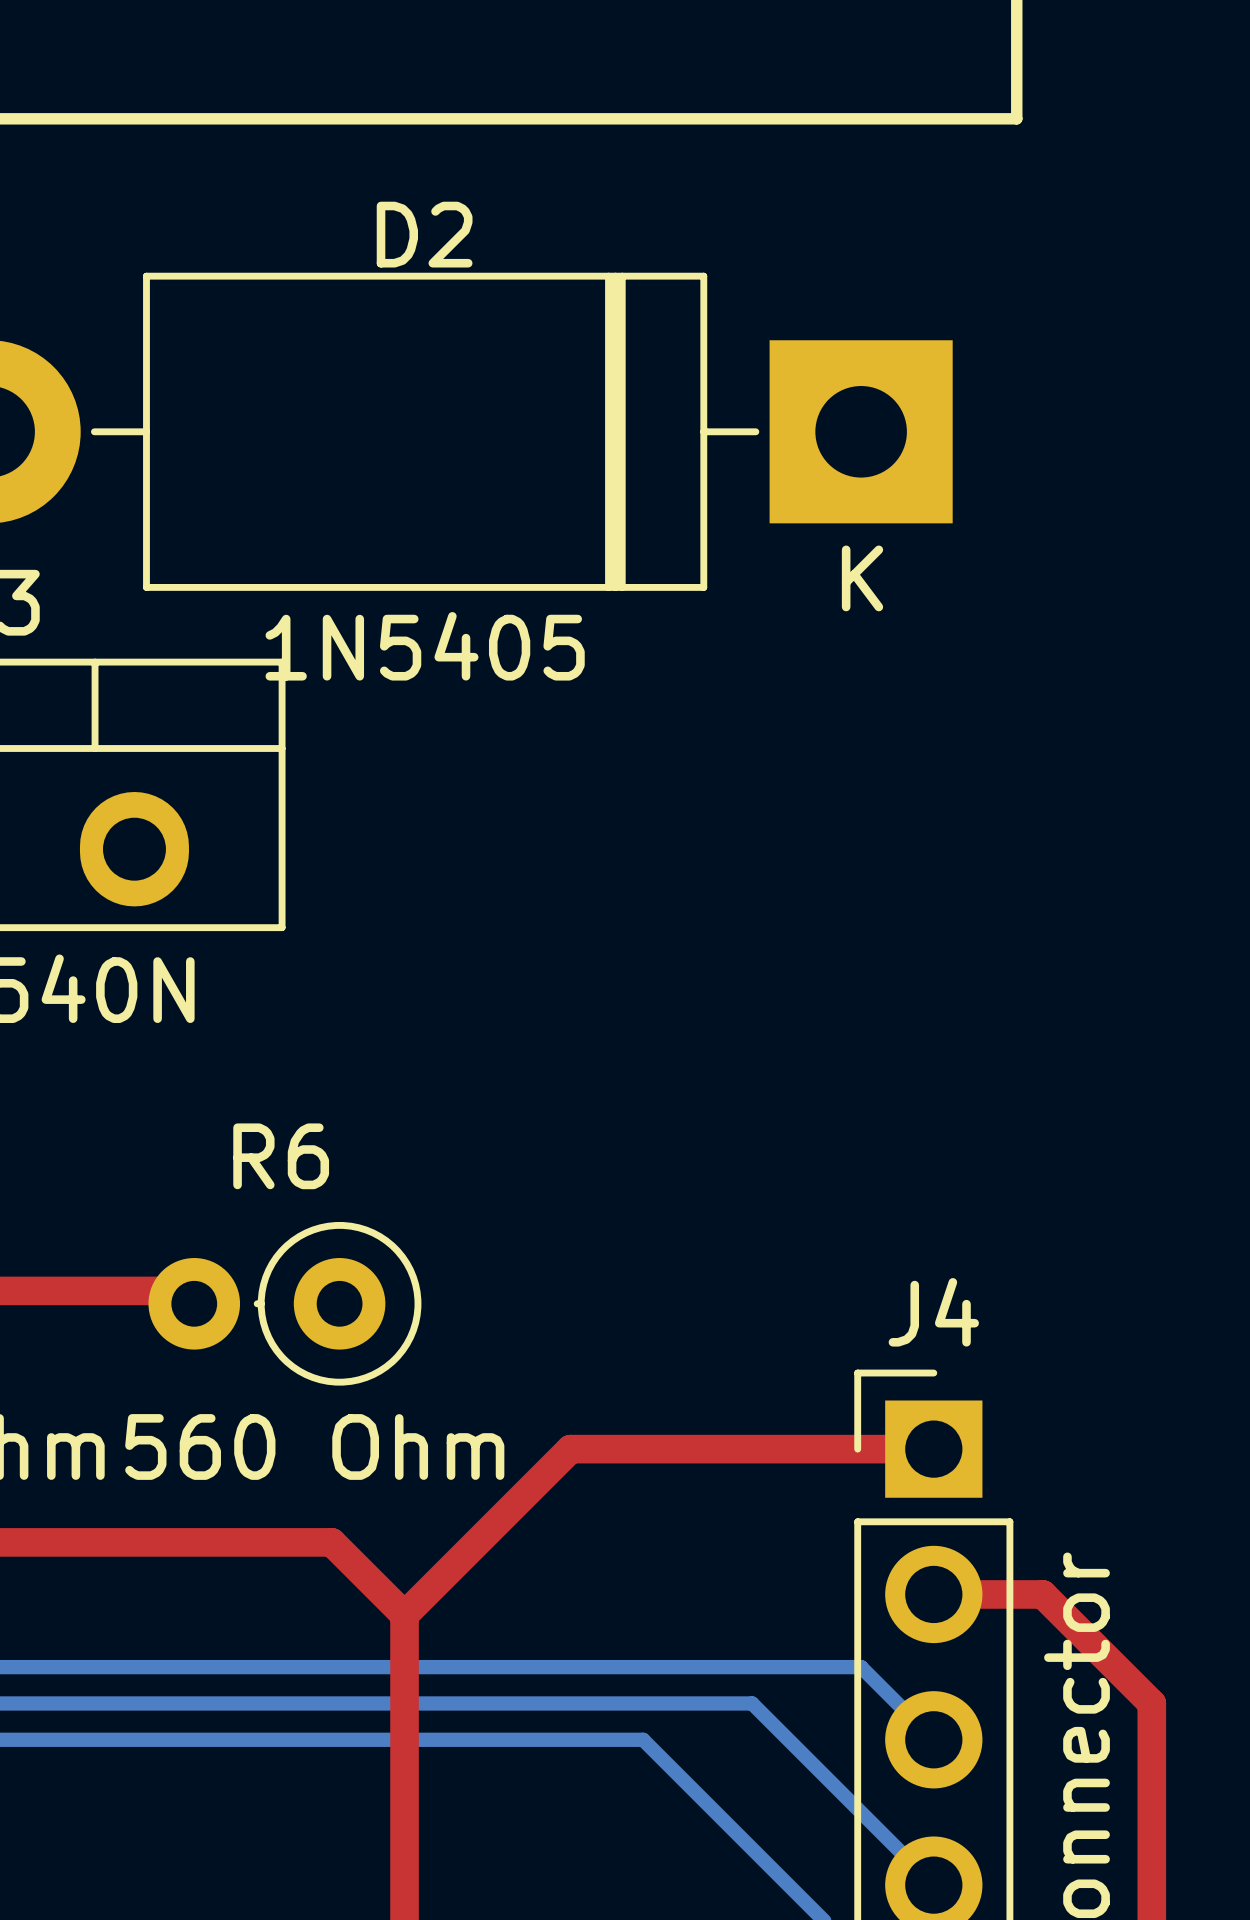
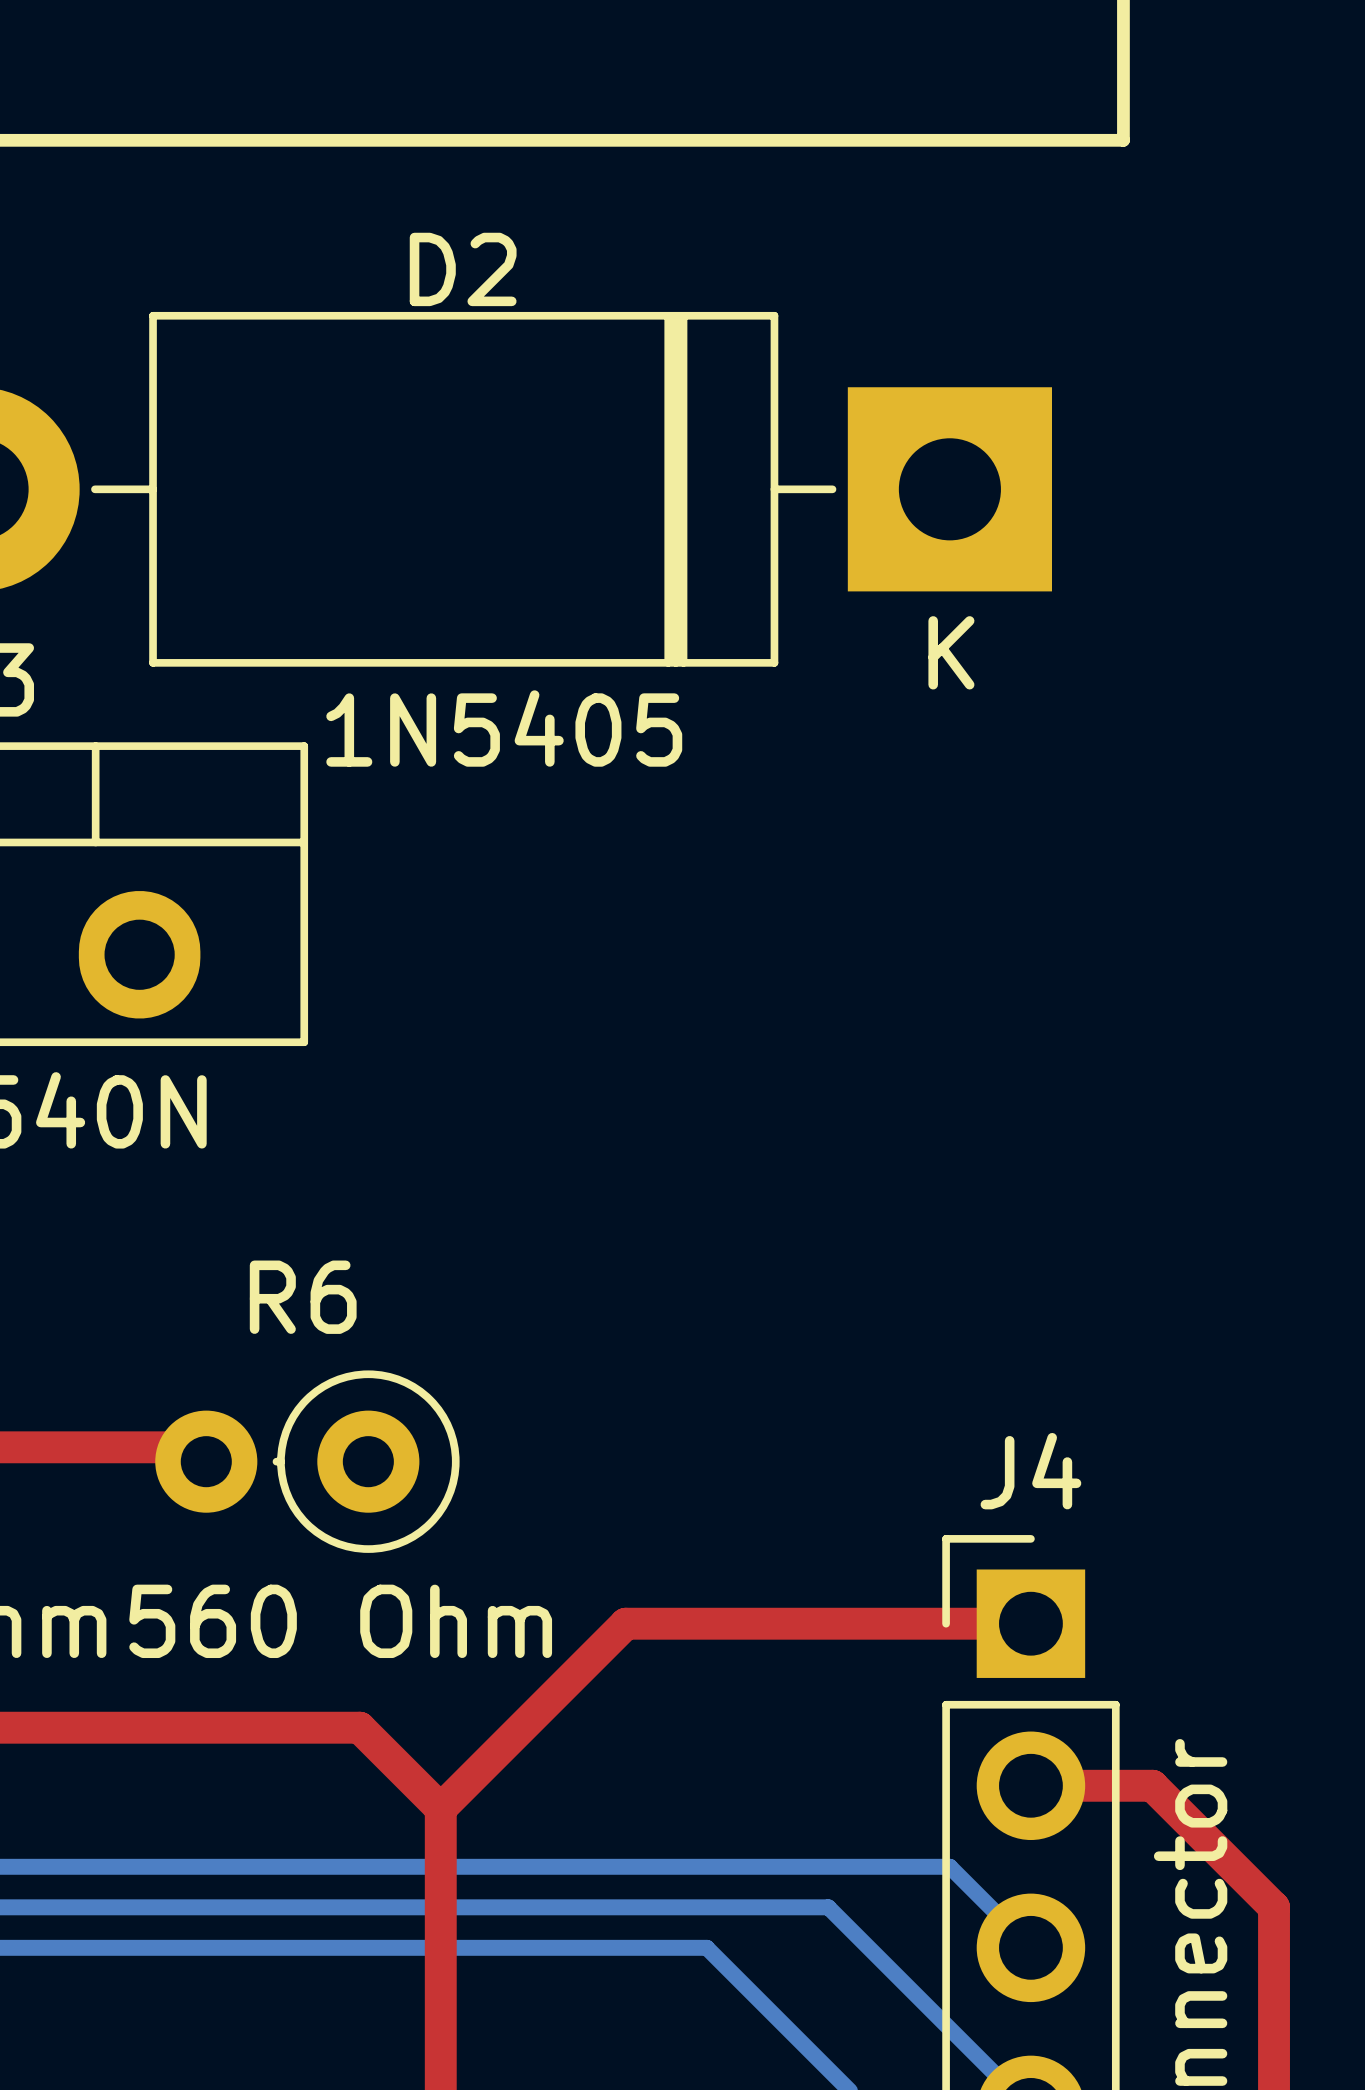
D2 value position: 1N5405 (425, 646) -> 1N5405 (504, 728)

